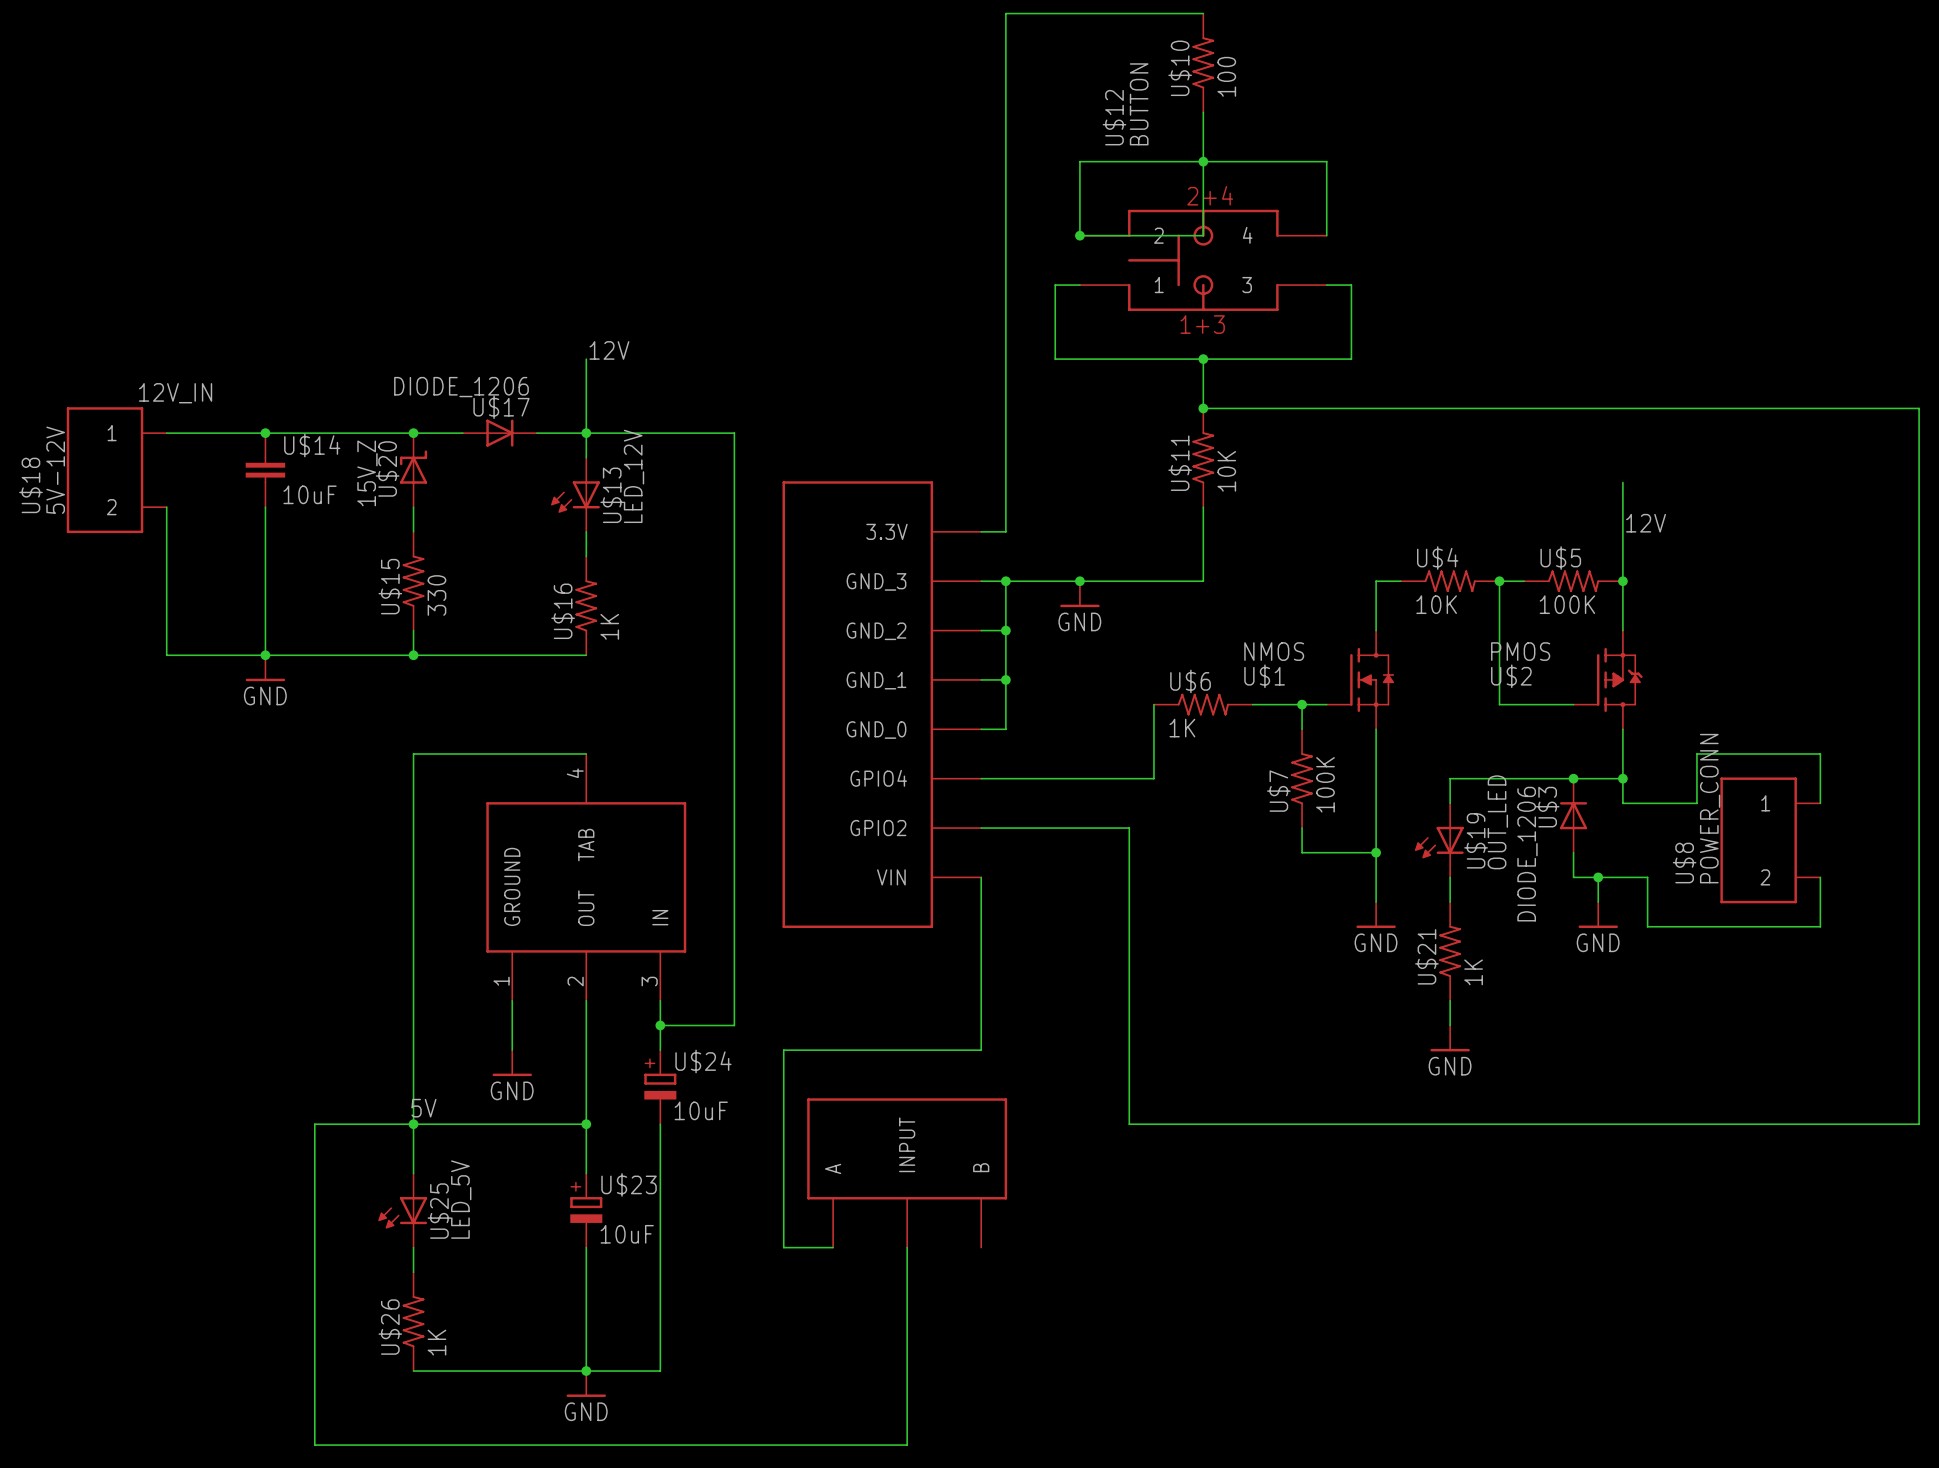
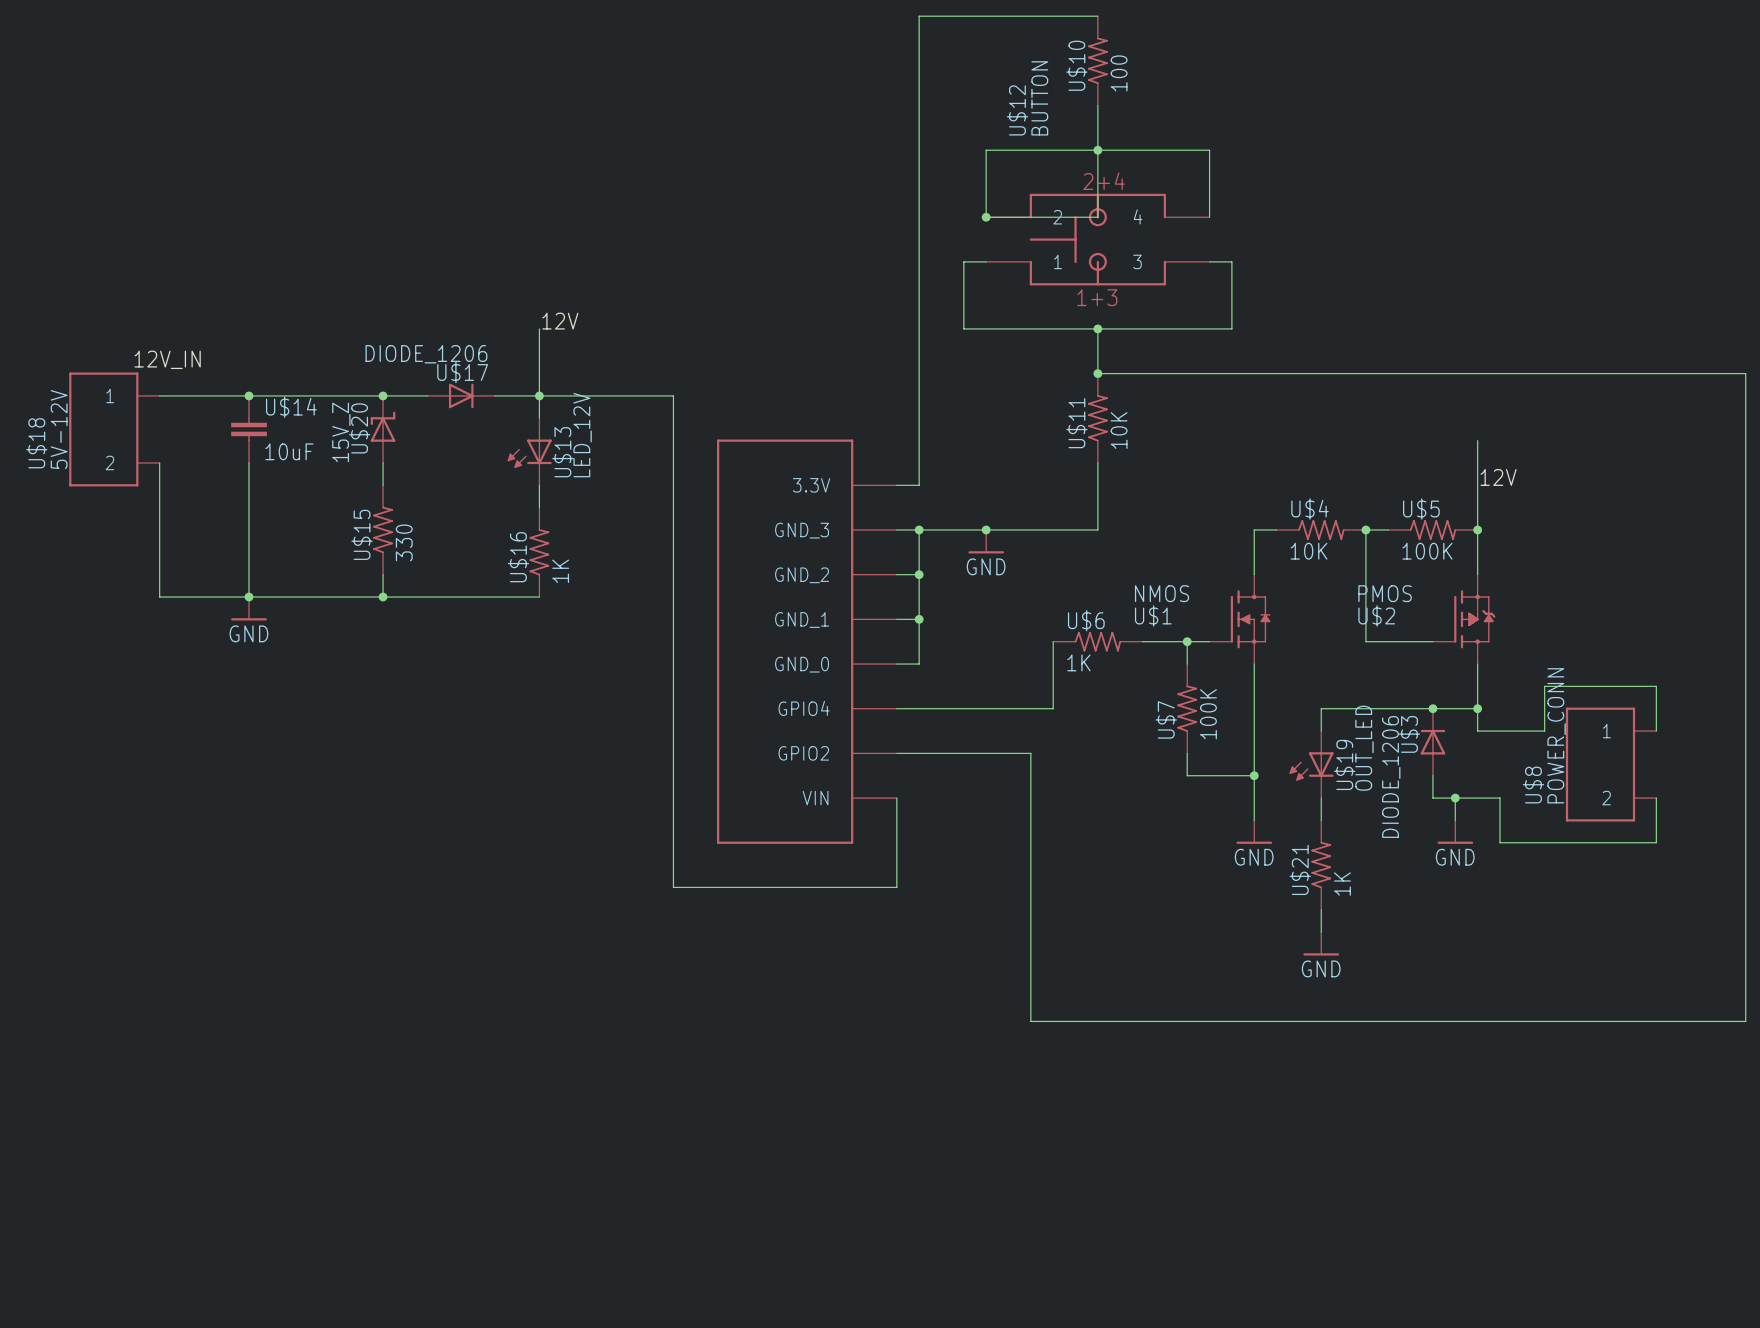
wire: (586, 753) (413, 753) (413, 1173) -> none
part: (586, 877) -> none
wire: (734, 976) (734, 1025) (660, 1025) -> none
wire: (981, 976) (981, 1050) (783, 1050) (783, 1247) (833, 1247) -> (896, 887) (673, 887)
wire: (512, 1000) (512, 1050) -> none
wire: (586, 1000) (586, 1173) -> none
wire: (660, 1000) (660, 1050) -> none
junction: (660, 1025) -> none
power symbol: GND (512, 1063) -> none
U$24: 10uF (660, 1087) -> none
label: 5V (423, 1108) -> none
junction: (413, 1124) -> none
wire: (586, 1124) (314, 1124) (314, 1445) (907, 1445) (907, 1247) -> none
junction: (586, 1124) -> none
wire: (660, 1124) (660, 1371) (413, 1371) -> none
part: (907, 1172) -> none
U$25: LED_5V (402, 1210) -> none
U$23: 10uF (586, 1210) -> none
wire: (413, 1247) (413, 1272) -> none
wire: (586, 1247) (586, 1371) -> none
U$26: 1K (413, 1321) -> none
junction: (586, 1371) -> none
power symbol: GND (586, 1383) -> none

